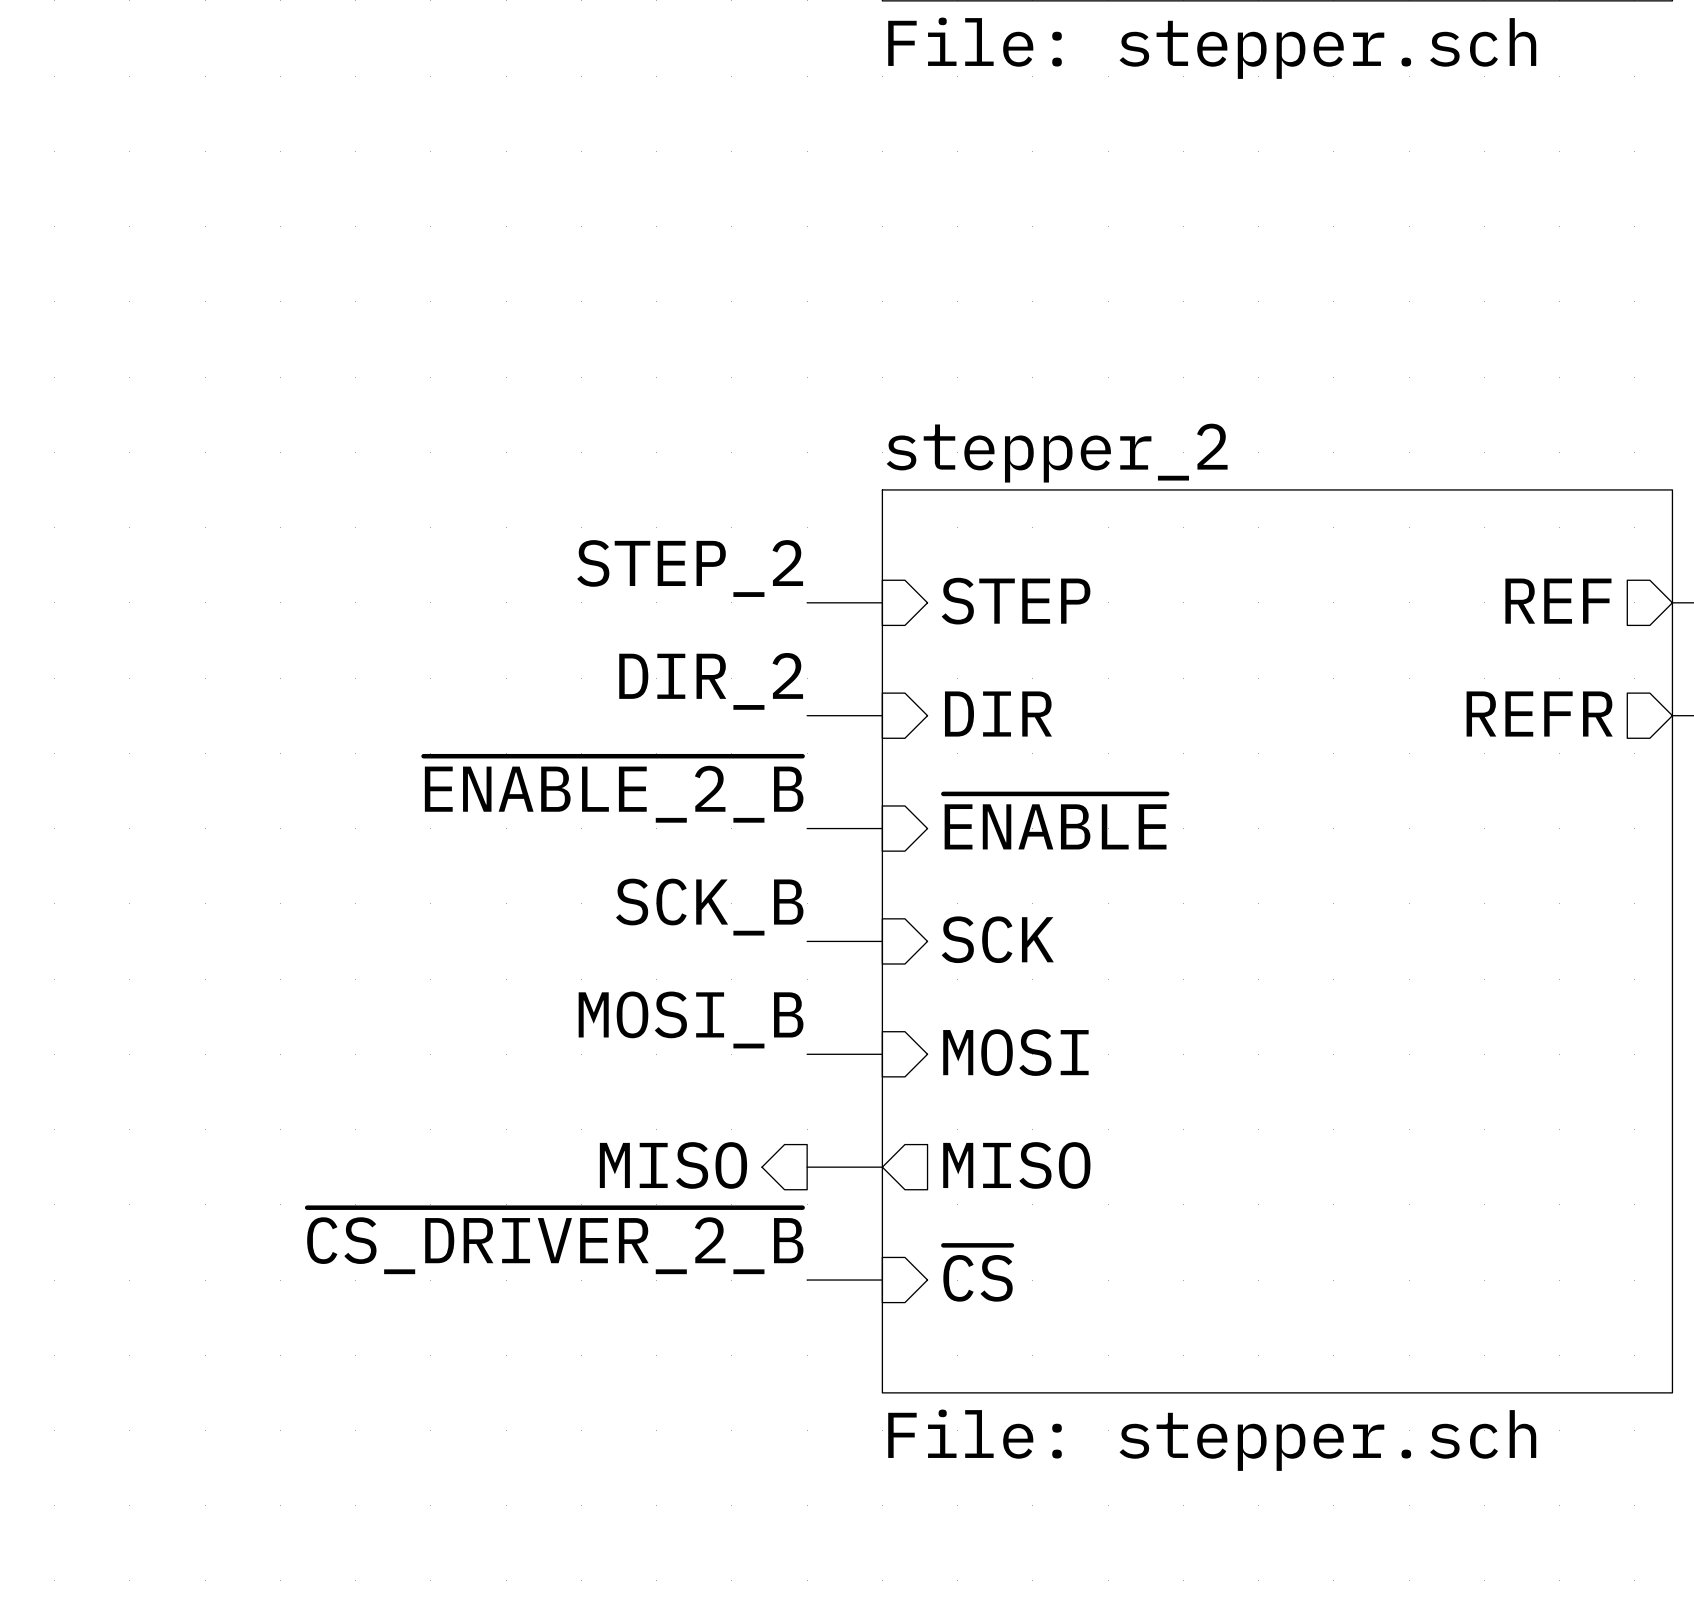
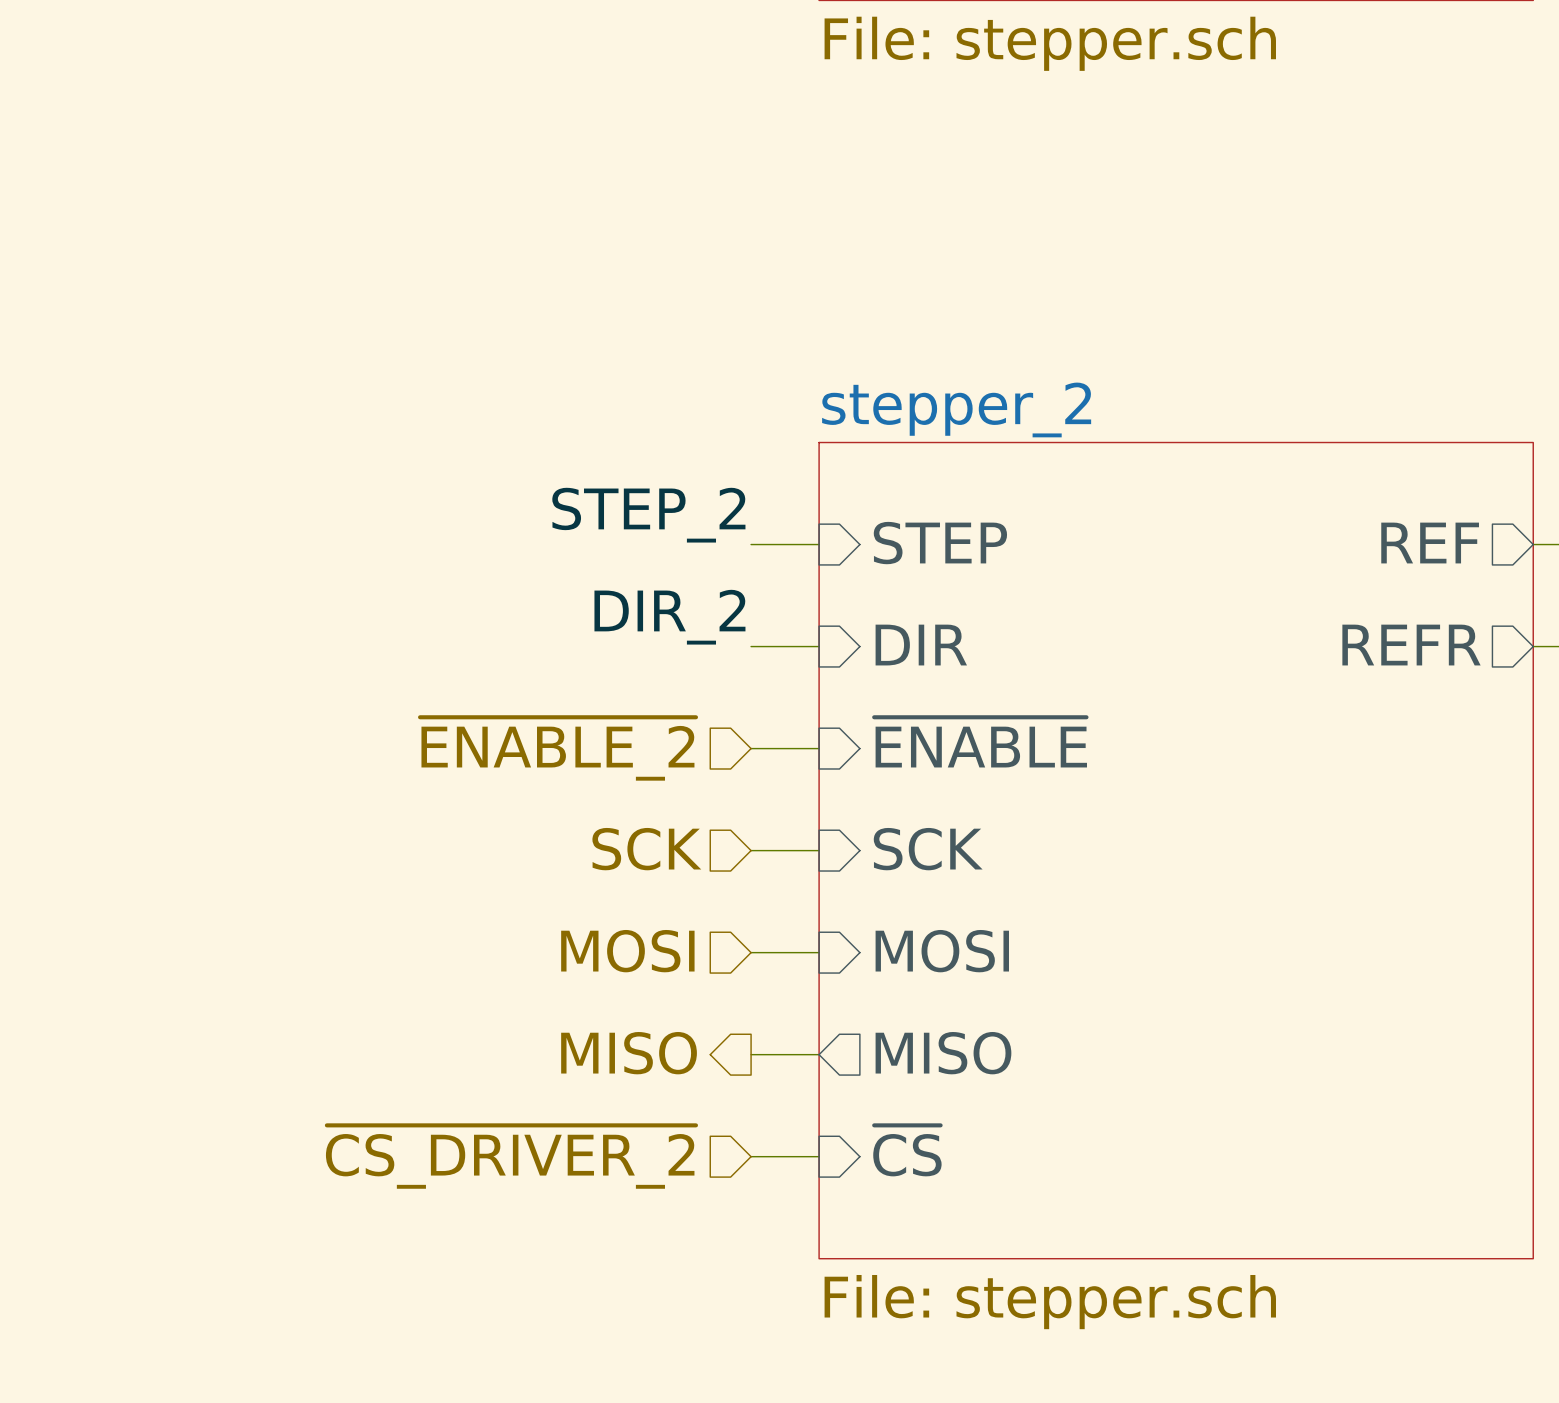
label: ~{ENABLE_2_B} (613, 789) -> none
hierarchical label: none -> ~{ENABLE_2} (558, 748)
label: SCK_B (709, 907) -> none
hierarchical label: none -> SCK (646, 849)
label: MOSI_B (691, 1019) -> none
hierarchical label: none -> MOSI (627, 951)
label: ~{CS_DRIVER_2_B} (555, 1240) -> none
hierarchical label: none -> ~{CS_DRIVER_2} (510, 1157)

